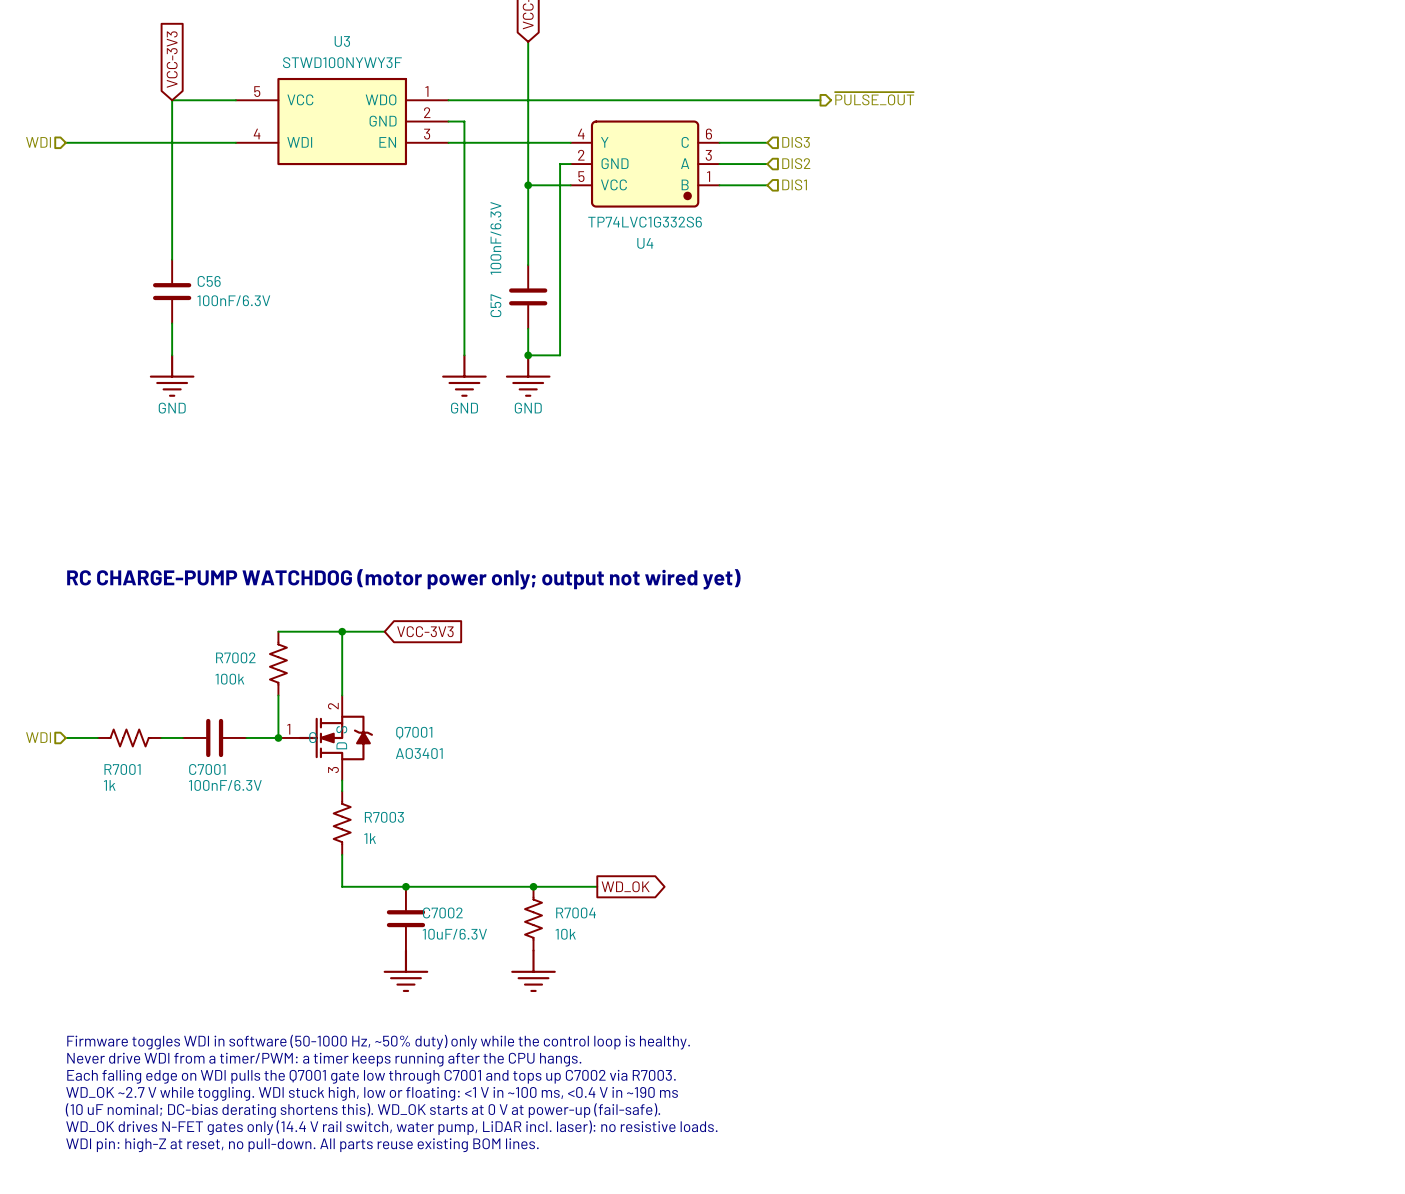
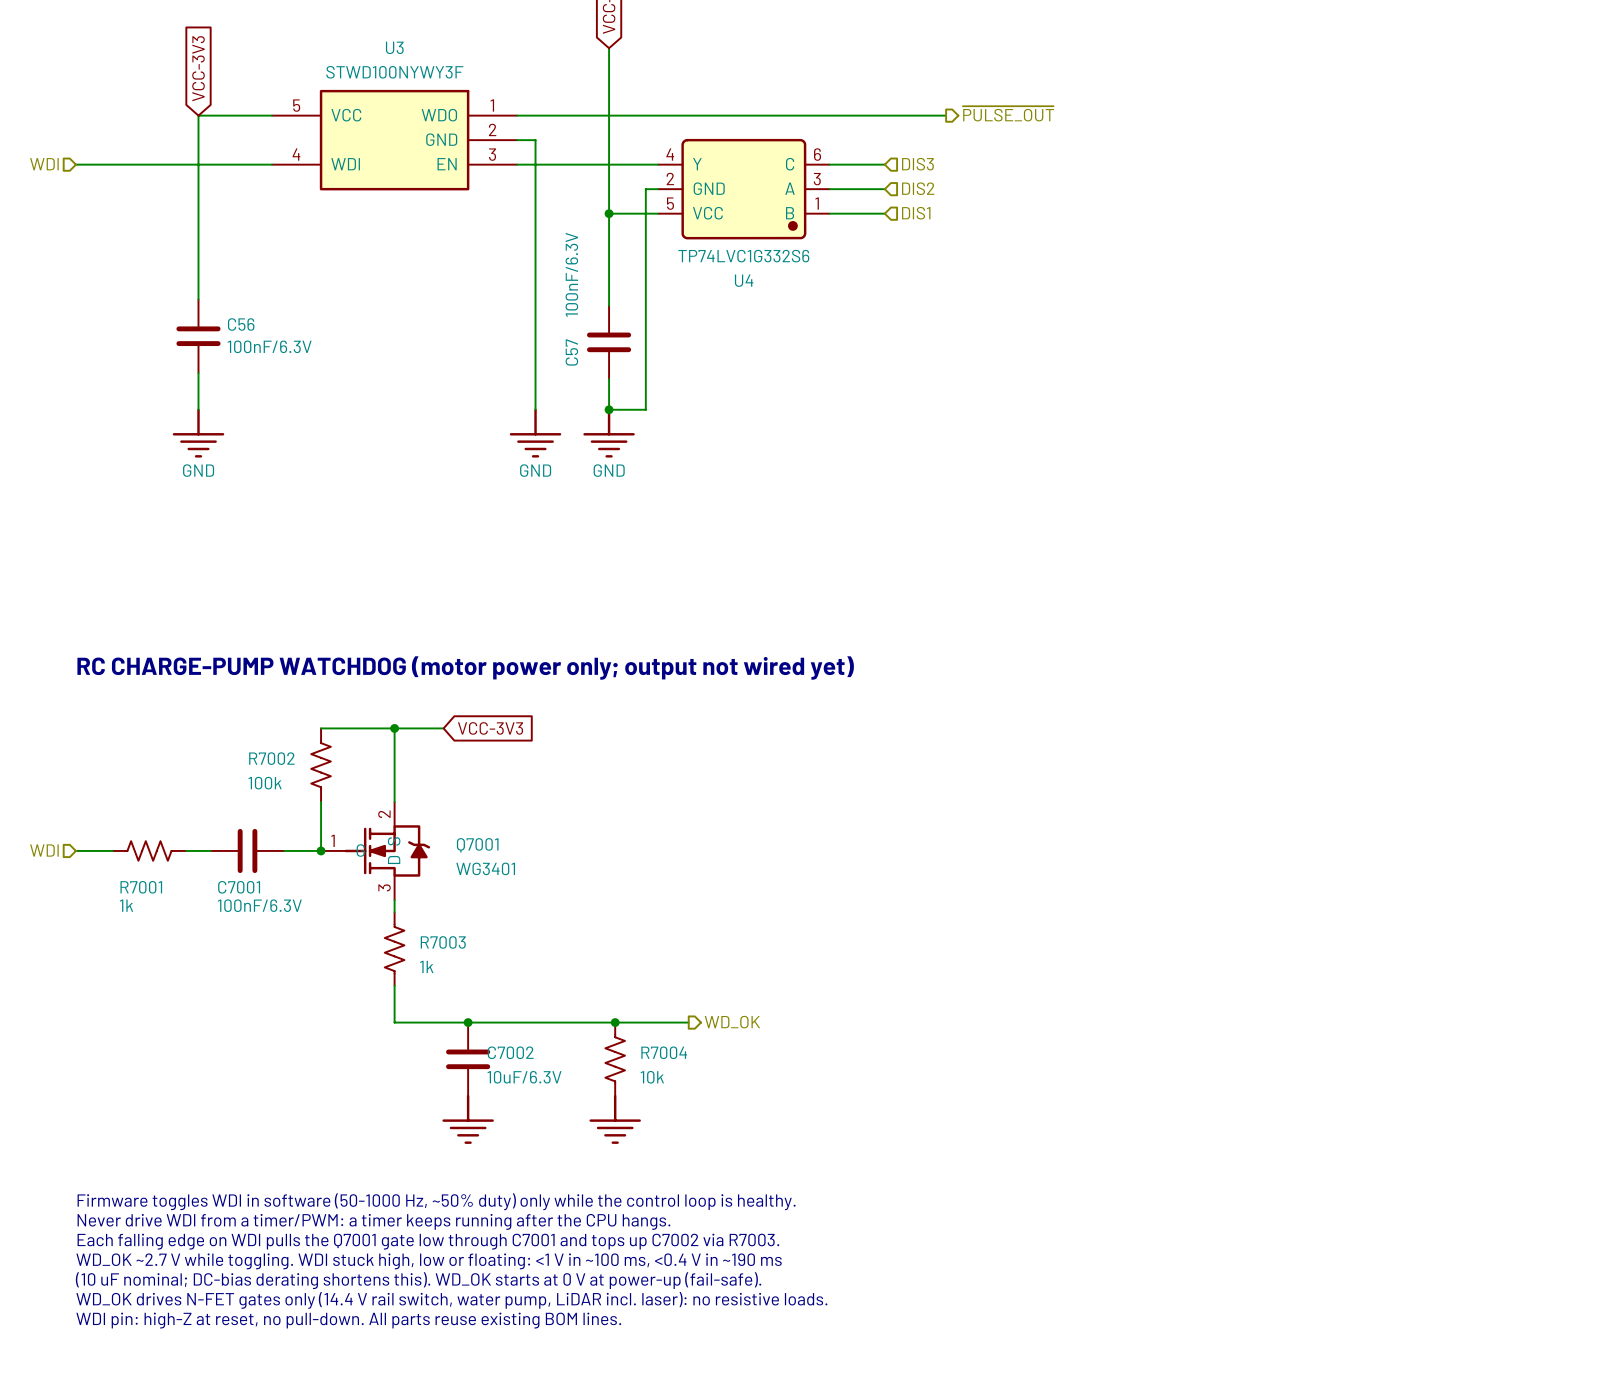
Q7001 value: AO3401 (419, 753) -> WG3401 (485, 868)
global label: WD_OK (625, 886) -> none
hierarchical label: none -> WD_OK (732, 1022)

